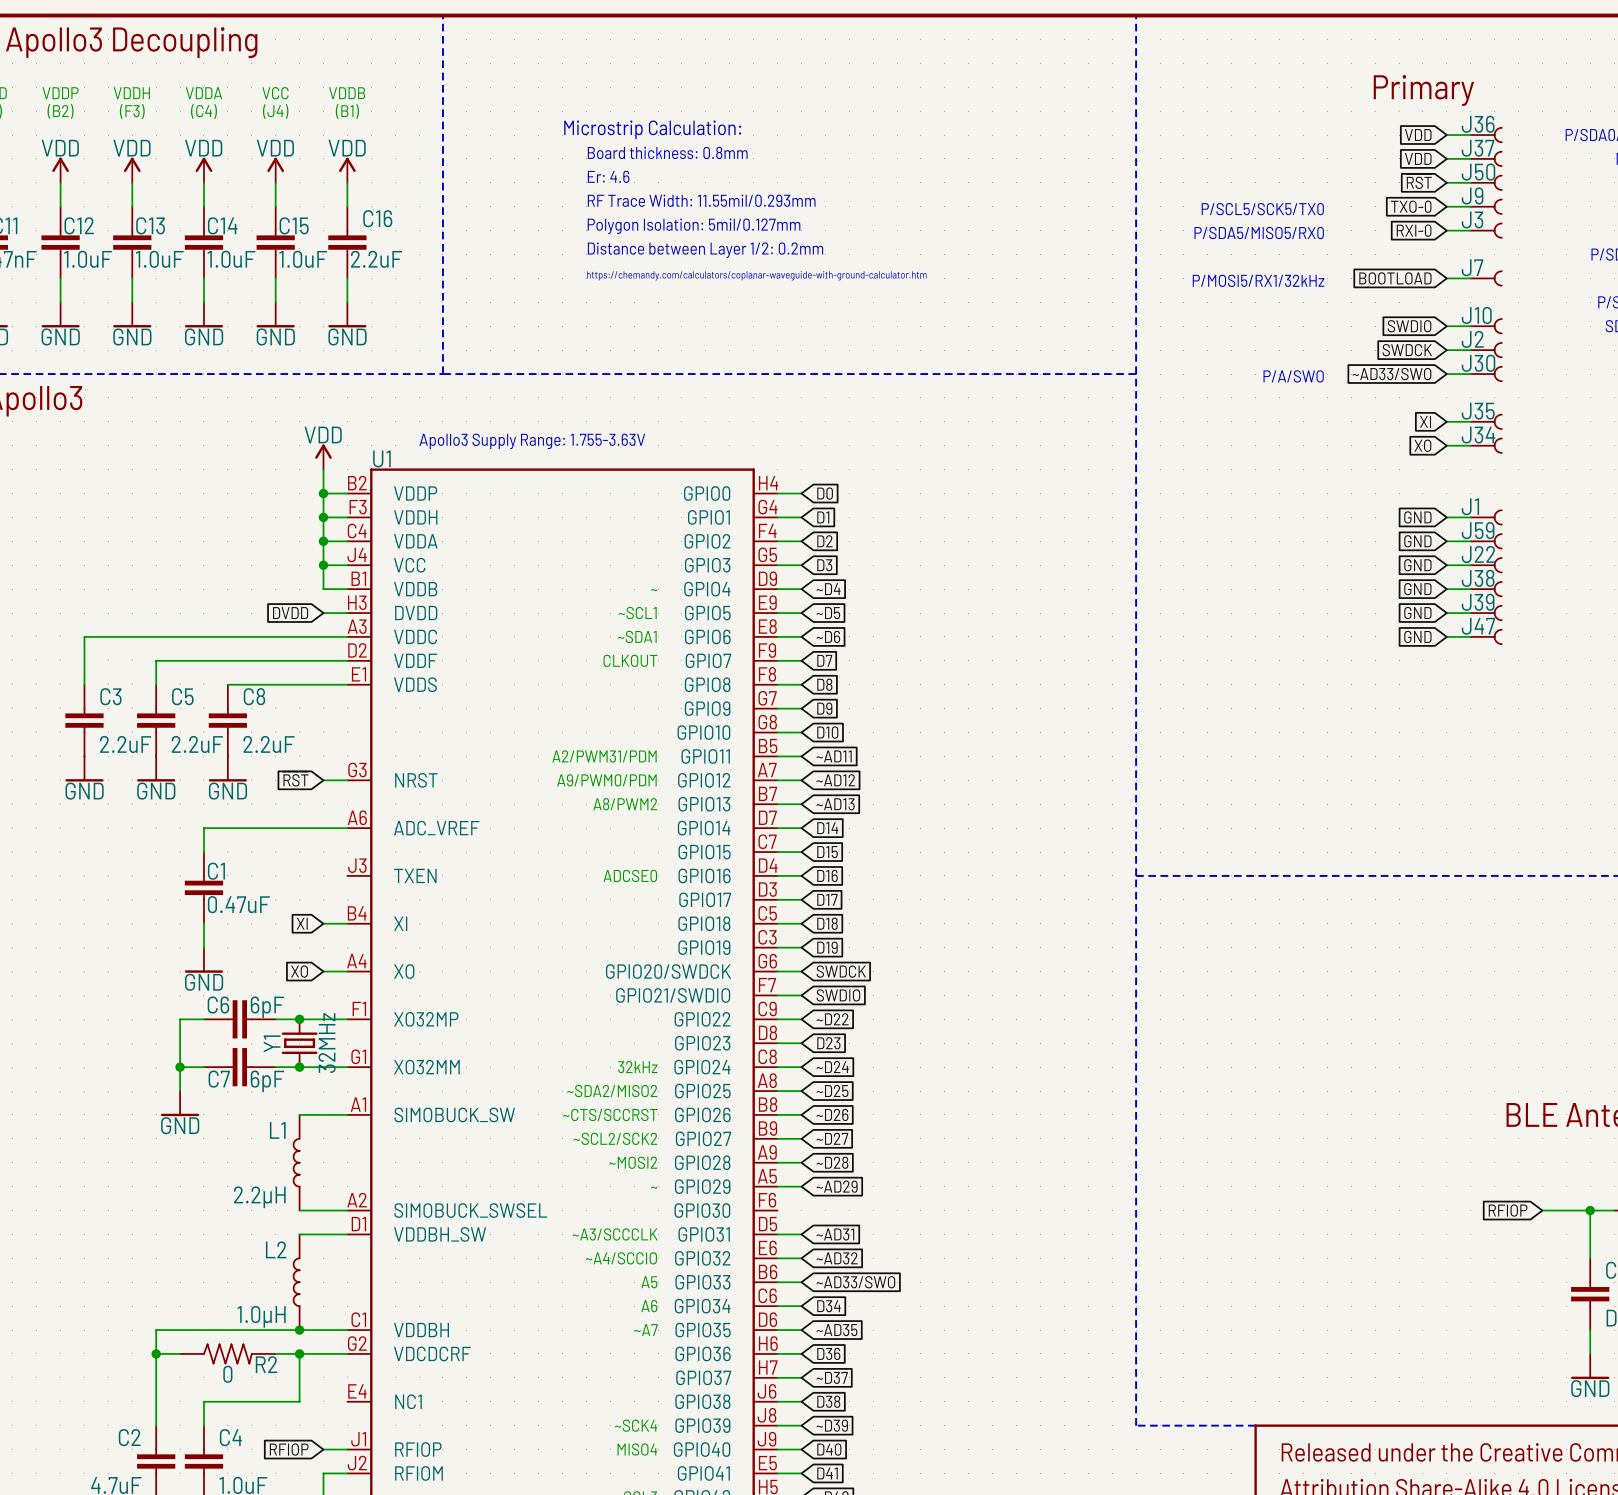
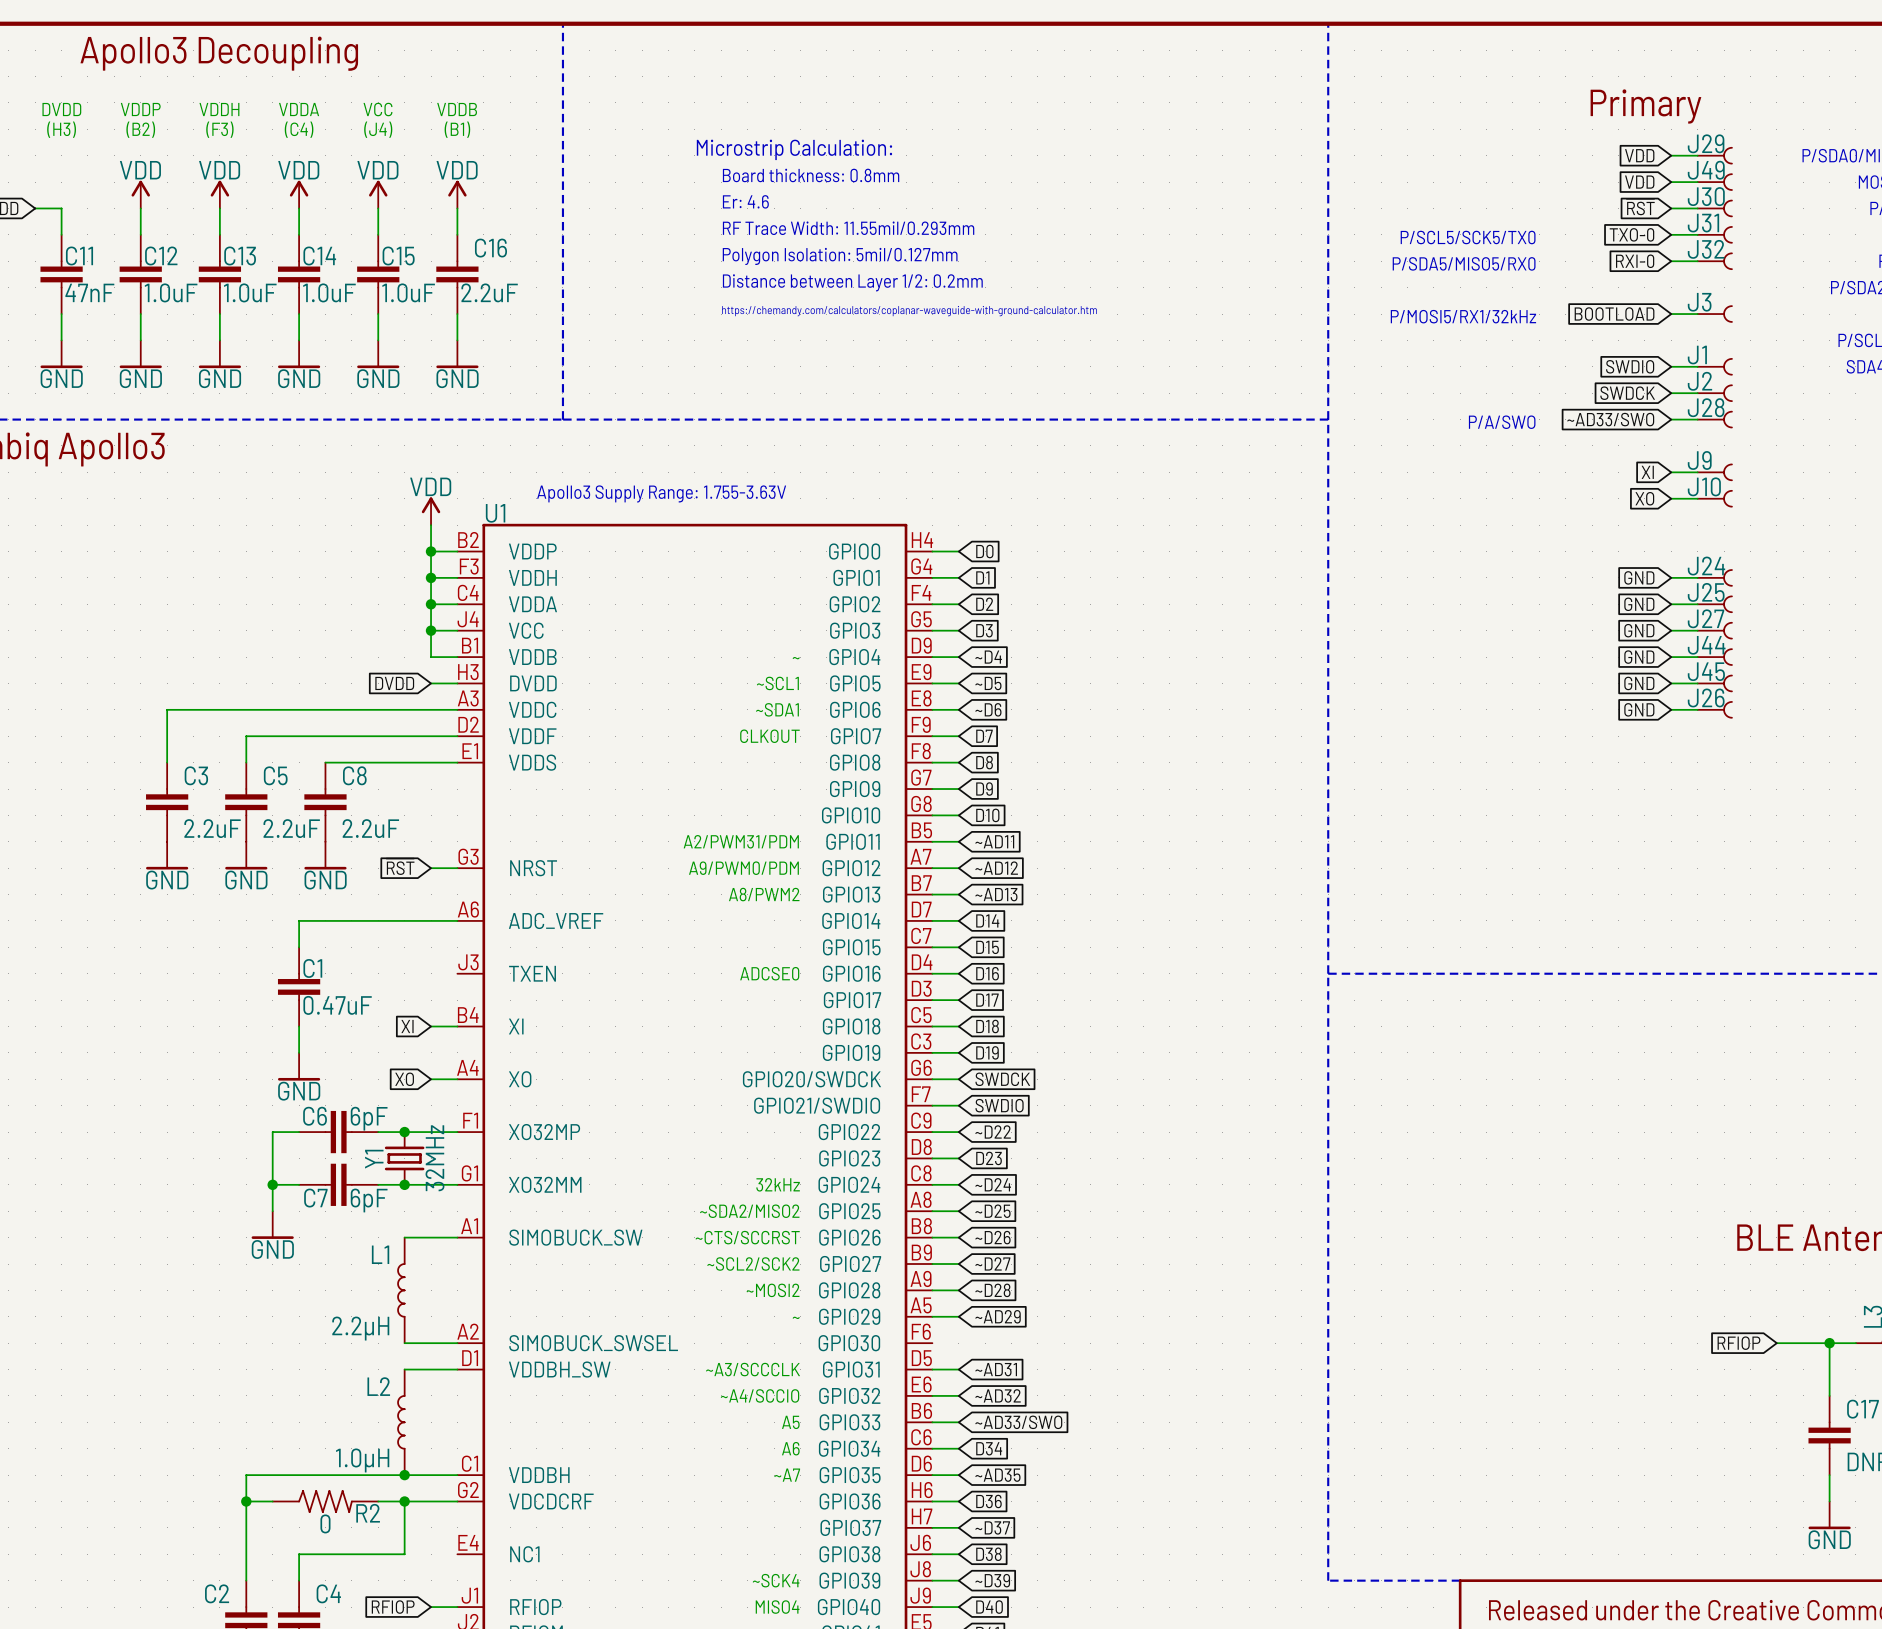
J36 name: J36 (1478, 124) -> J29 (1706, 143)
J37 name: J37 (1478, 148) -> J49 (1706, 170)
J50 name: J50 (1478, 172) -> J30 (1706, 196)
J9 name: J9 (1472, 195) -> J31 (1703, 223)
J3 name: J3 (1472, 219) -> J32 (1706, 249)
J7 name: J7 (1472, 267) -> J3 (1699, 302)
J10 name: J10 (1476, 315) -> J1 (1697, 355)
J30 name: J30 (1478, 363) -> J28 (1706, 407)
J35 name: J35 (1478, 411) -> J9 (1699, 460)
J34 name: J34 (1478, 435) -> J10 (1704, 486)
J1 name: J1 (1470, 506) -> J24 (1706, 566)
J59 name: J59 (1478, 530) -> J25 (1706, 592)
J22 name: J22 (1478, 554) -> J27 (1706, 618)
J38 name: J38 (1478, 578) -> J44 (1706, 645)
J39 name: J39 (1478, 602) -> J45 (1706, 671)
J47 name: J47 (1478, 626) -> J26 (1706, 697)

